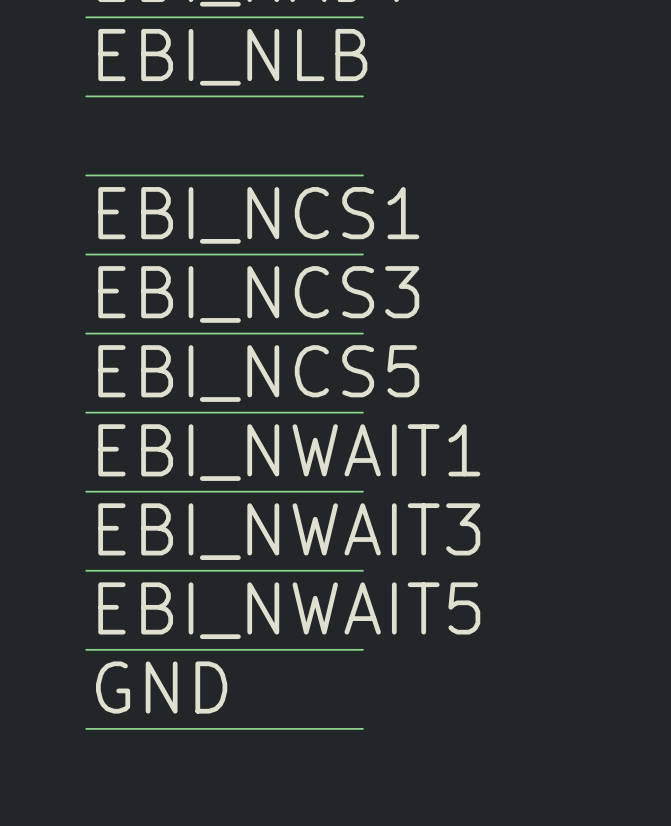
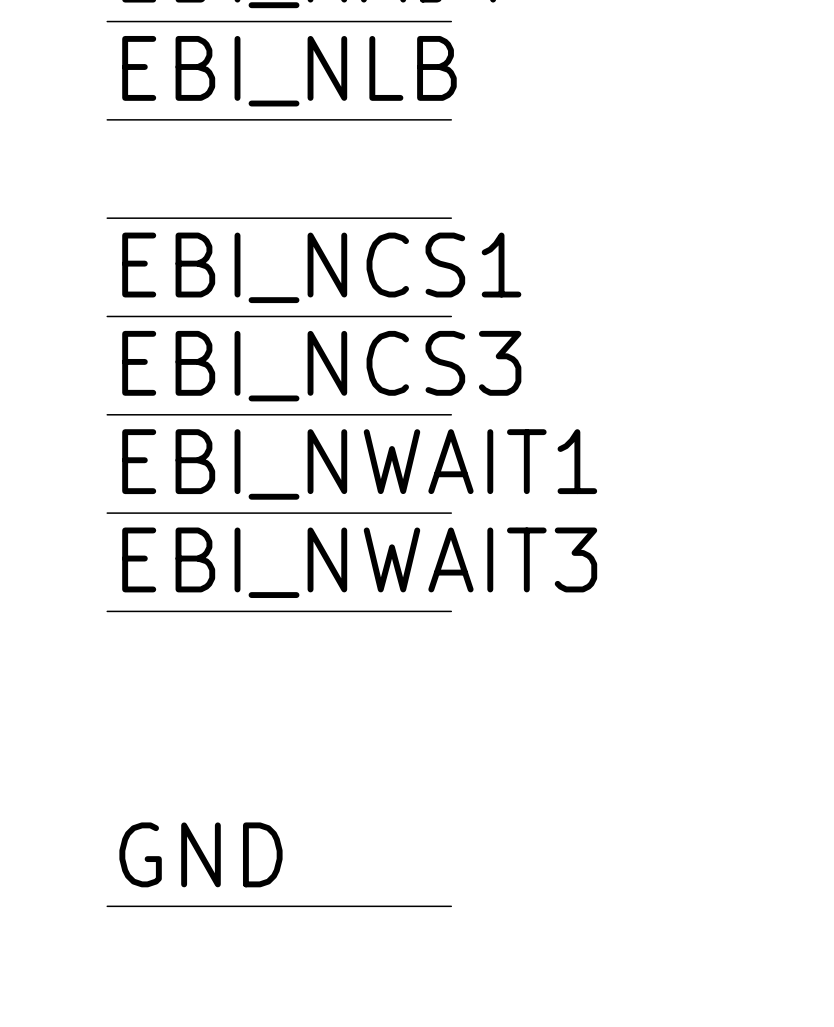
label: EBI_NCS5 (258, 373) -> EBI_NWAIT1 (359, 464)
label: EBI_NWAIT1 (289, 452) -> EBI_NWAIT3 (359, 562)
label: EBI_NWAIT3 (289, 531) -> none
wire: (86, 570) (362, 570) -> none
label: EBI_NWAIT5 (289, 610) -> none
wire: (86, 649) (362, 649) -> none

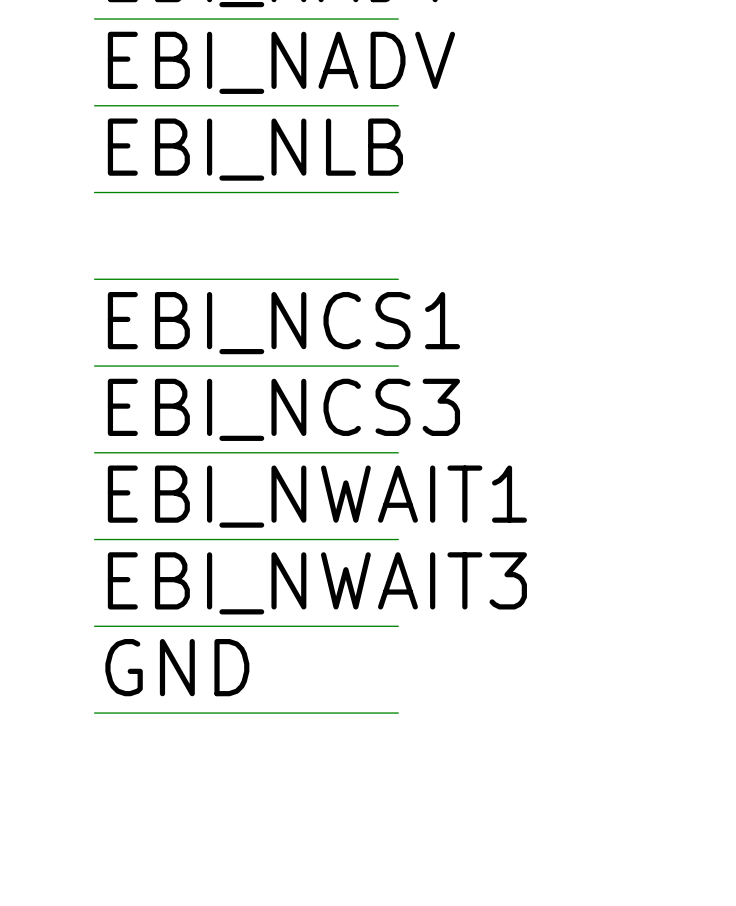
label: EBI_NLB (289, 71) -> EBI_NADV (281, 62)
label: EBI_NCS1 (321, 267) -> EBI_NLB (255, 149)
label: EBI_NCS3 (321, 366) -> EBI_NCS1 (283, 323)
label: EBI_NWAIT1 (359, 464) -> EBI_NCS3 (283, 409)
label: EBI_NWAIT3 (359, 562) -> EBI_NWAIT1 (317, 496)
label: none -> EBI_NWAIT3 (317, 583)
wire: none -> (94, 626) (398, 626)
label position: GND (200, 854) -> GND (177, 667)
wire: (107, 906) (451, 906) -> (94, 713) (398, 713)

